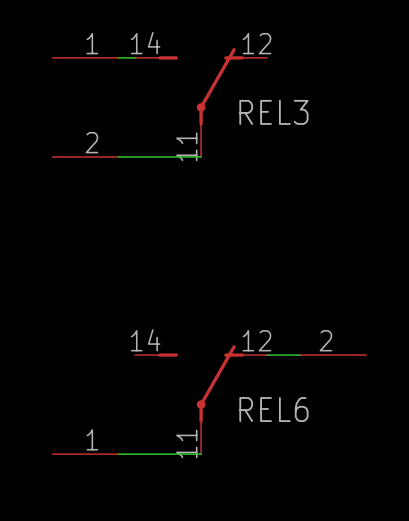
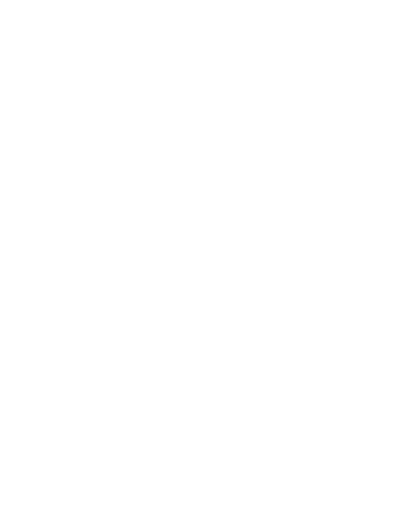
part: (85, 57) -> none
wire: (118, 57) (135, 57) -> none
REL3: (201, 102) -> none
part: (85, 156) -> none
wire: (118, 156) (201, 156) -> none
wire: (267, 355) (300, 355) -> none
part: (333, 355) -> none
REL6: (201, 399) -> none
part: (85, 454) -> none
wire: (118, 454) (201, 454) -> none

